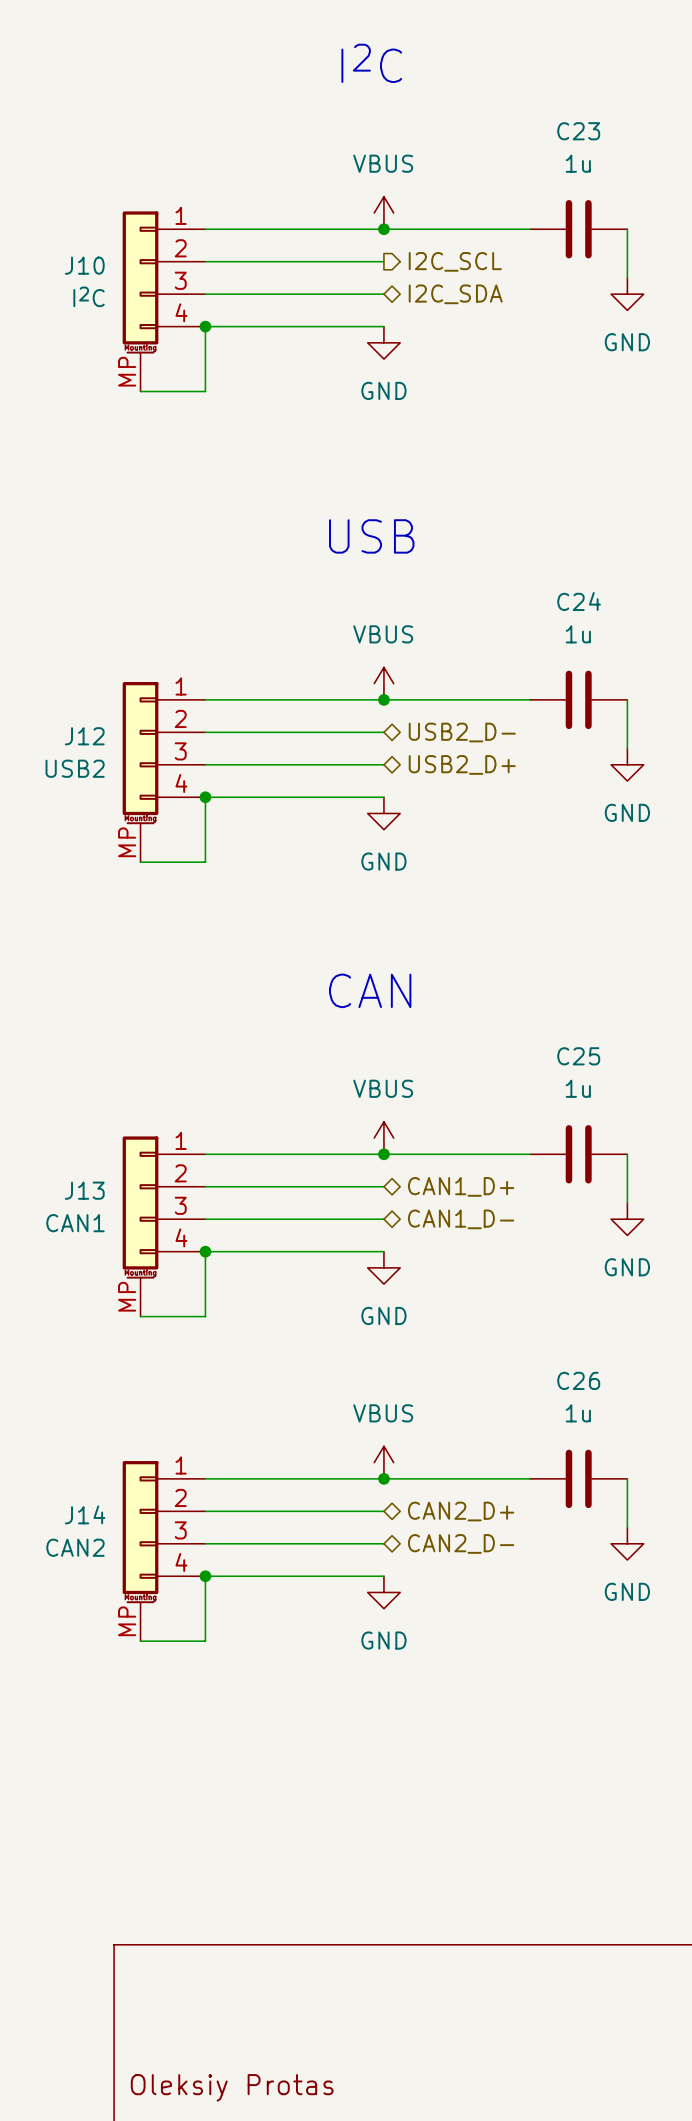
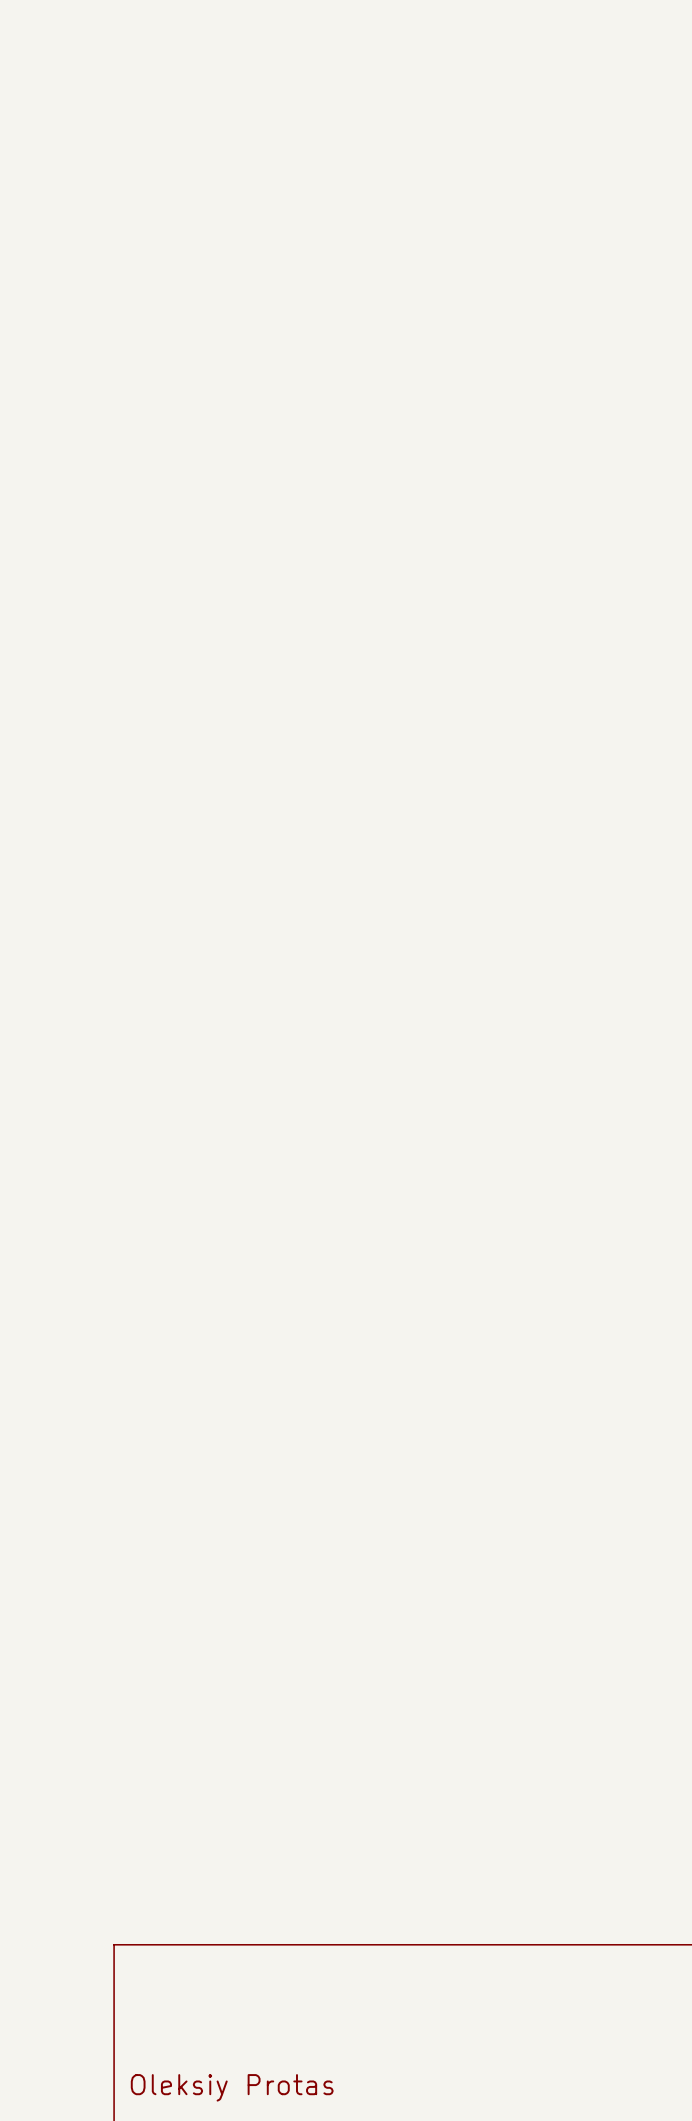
text: I2C (371, 63) -> none
power symbol: VBUS (383, 213) -> none
wire: (205, 229) (530, 229) -> none
junction: (383, 229) -> none
C23: 1u (578, 229) -> none
wire: (627, 229) (627, 277) -> none
wire: (205, 261) (383, 261) -> none
hierarchical label: I2C_SCL (455, 261) -> none
wire: (205, 294) (383, 294) -> none
hierarchical label: I2C_SDA (455, 294) -> none
power symbol: GND (627, 294) -> none
J10: I2C (164, 301) -> none
junction: (205, 326) -> none
wire: (383, 326) (205, 326) (205, 391) (140, 391) -> none
power symbol: GND (383, 342) -> none
text: USB (371, 536) -> none
power symbol: VBUS (383, 683) -> none
wire: (205, 699) (530, 699) -> none
junction: (383, 699) -> none
C24: 1u (578, 699) -> none
wire: (627, 699) (627, 748) -> none
wire: (205, 732) (383, 732) -> none
hierarchical label: USB2_D- (462, 732) -> none
wire: (205, 764) (383, 764) -> none
hierarchical label: USB2_D+ (462, 764) -> none
power symbol: GND (627, 764) -> none
J12: USB2 (164, 772) -> none
junction: (205, 797) -> none
wire: (383, 797) (205, 797) (205, 862) (140, 862) -> none
power symbol: GND (383, 813) -> none
text: CAN (370, 990) -> none
power symbol: VBUS (383, 1138) -> none
wire: (205, 1154) (530, 1154) -> none
junction: (383, 1154) -> none
C25: 1u (578, 1154) -> none
wire: (627, 1154) (627, 1202) -> none
wire: (205, 1186) (383, 1186) -> none
hierarchical label: CAN1_D+ (461, 1186) -> none
wire: (205, 1219) (383, 1219) -> none
hierarchical label: CAN1_D- (461, 1219) -> none
power symbol: GND (627, 1219) -> none
J13: CAN1 (164, 1226) -> none
junction: (205, 1251) -> none
wire: (383, 1251) (205, 1251) (205, 1316) (140, 1316) -> none
power symbol: GND (383, 1267) -> none
power symbol: VBUS (383, 1462) -> none
wire: (205, 1478) (530, 1478) -> none
junction: (383, 1478) -> none
C26: 1u (578, 1478) -> none
wire: (627, 1478) (627, 1527) -> none
wire: (205, 1511) (383, 1511) -> none
hierarchical label: CAN2_D+ (461, 1511) -> none
wire: (205, 1543) (383, 1543) -> none
hierarchical label: CAN2_D- (461, 1543) -> none
power symbol: GND (627, 1543) -> none
J14: CAN2 (164, 1551) -> none
junction: (205, 1576) -> none
wire: (383, 1576) (205, 1576) (205, 1641) (140, 1641) -> none
power symbol: GND (383, 1592) -> none

